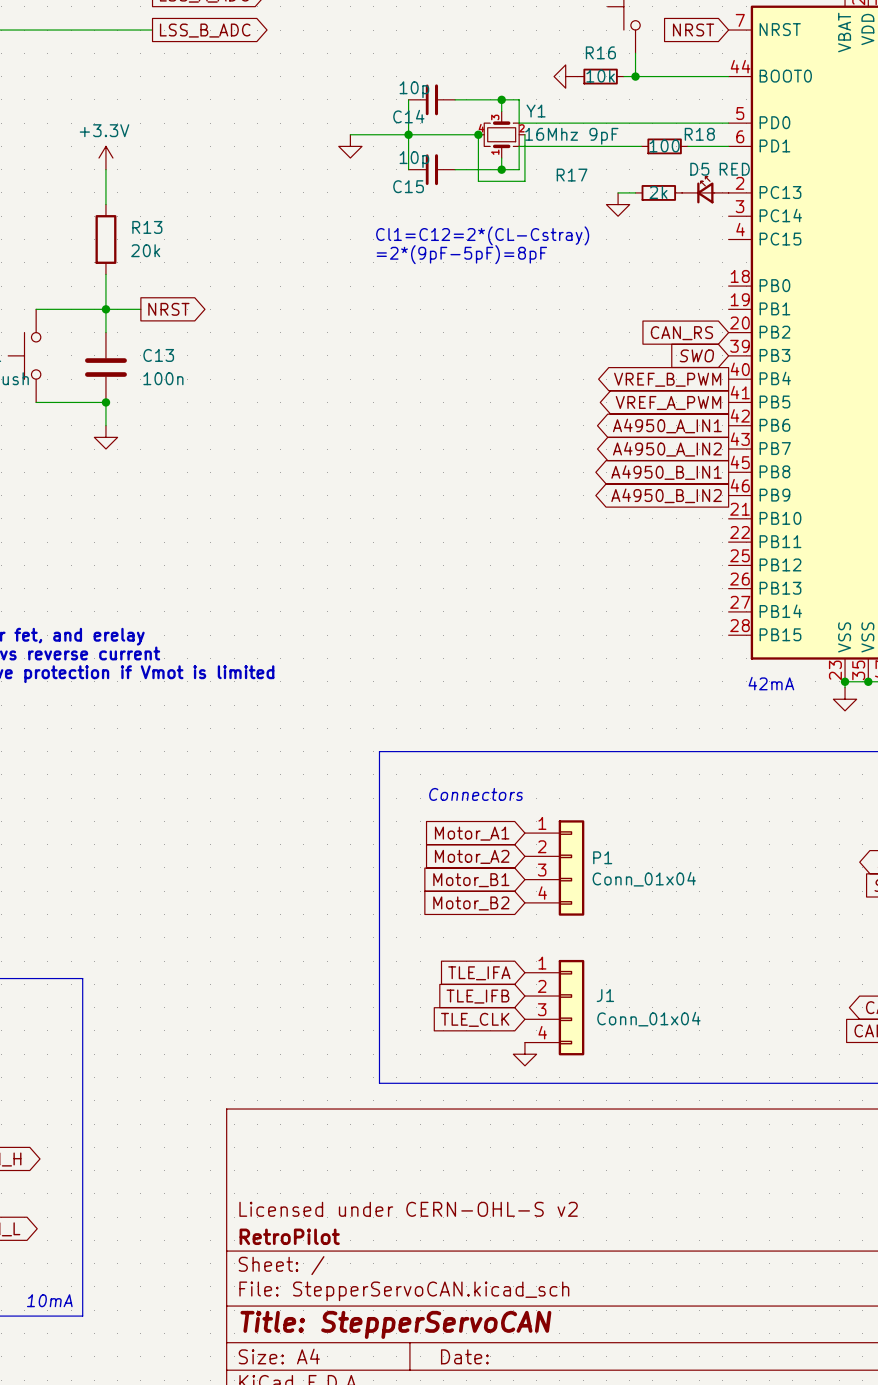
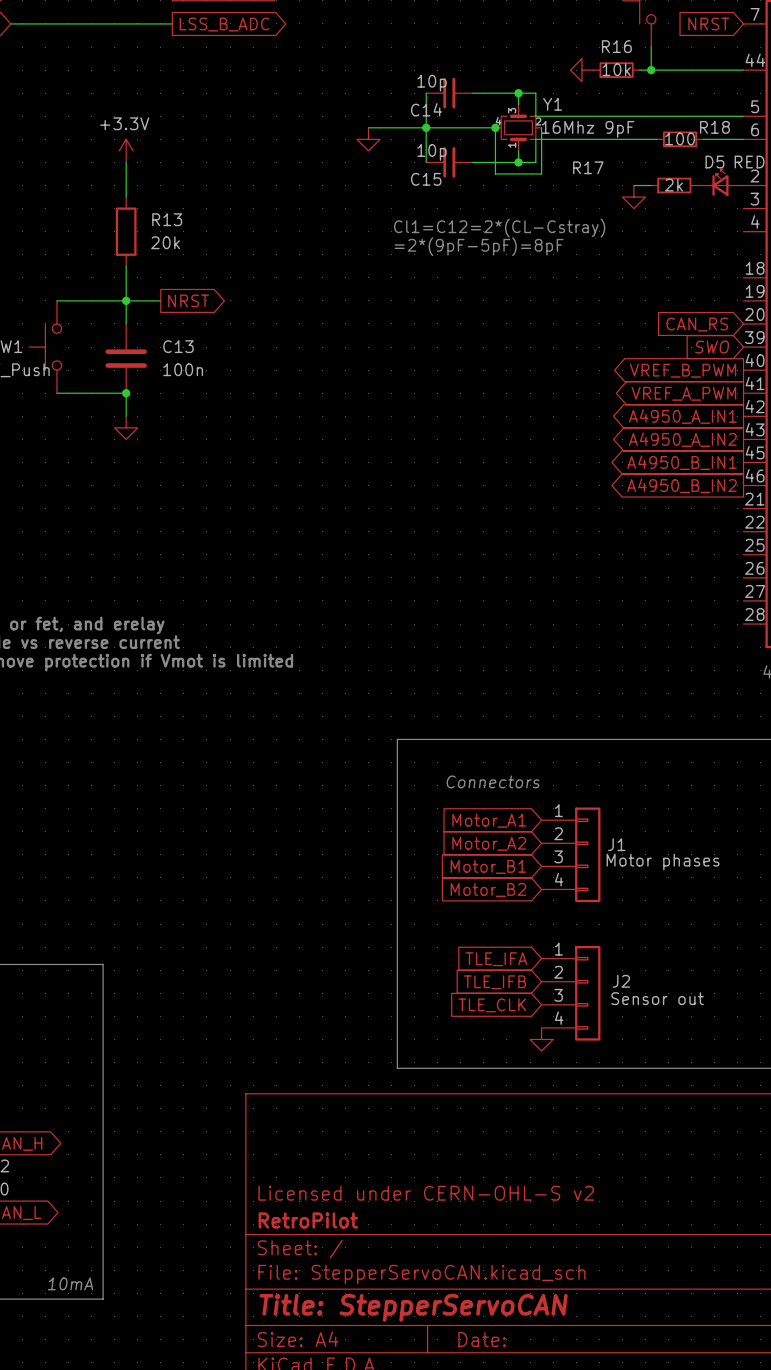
P1 name: P1 (602, 857) -> J1 (616, 844)
P1 text: none -> Motor phases (663, 862)
P1 value: Conn_01x04 (644, 879) -> none
J1 name: J1 (605, 995) -> J2 (621, 981)
J1 text: none -> Sensor out (657, 998)
J1 value: Conn_01x04 (648, 1019) -> none

